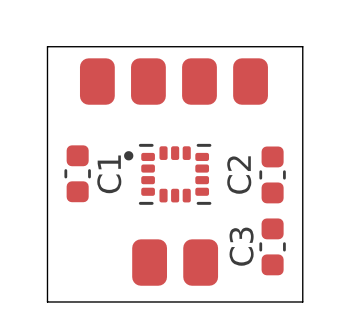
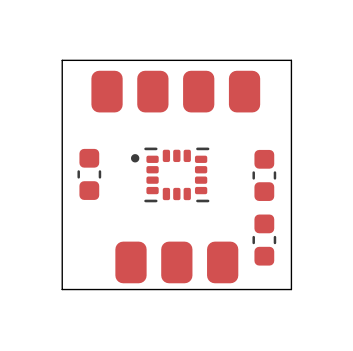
C1 name: C1 (109, 174) -> none
C2 name: C2 (239, 175) -> none
part footprint: [132, 239, 219, 286] -> [115, 241, 239, 284]
C3 name: C3 (241, 246) -> none

